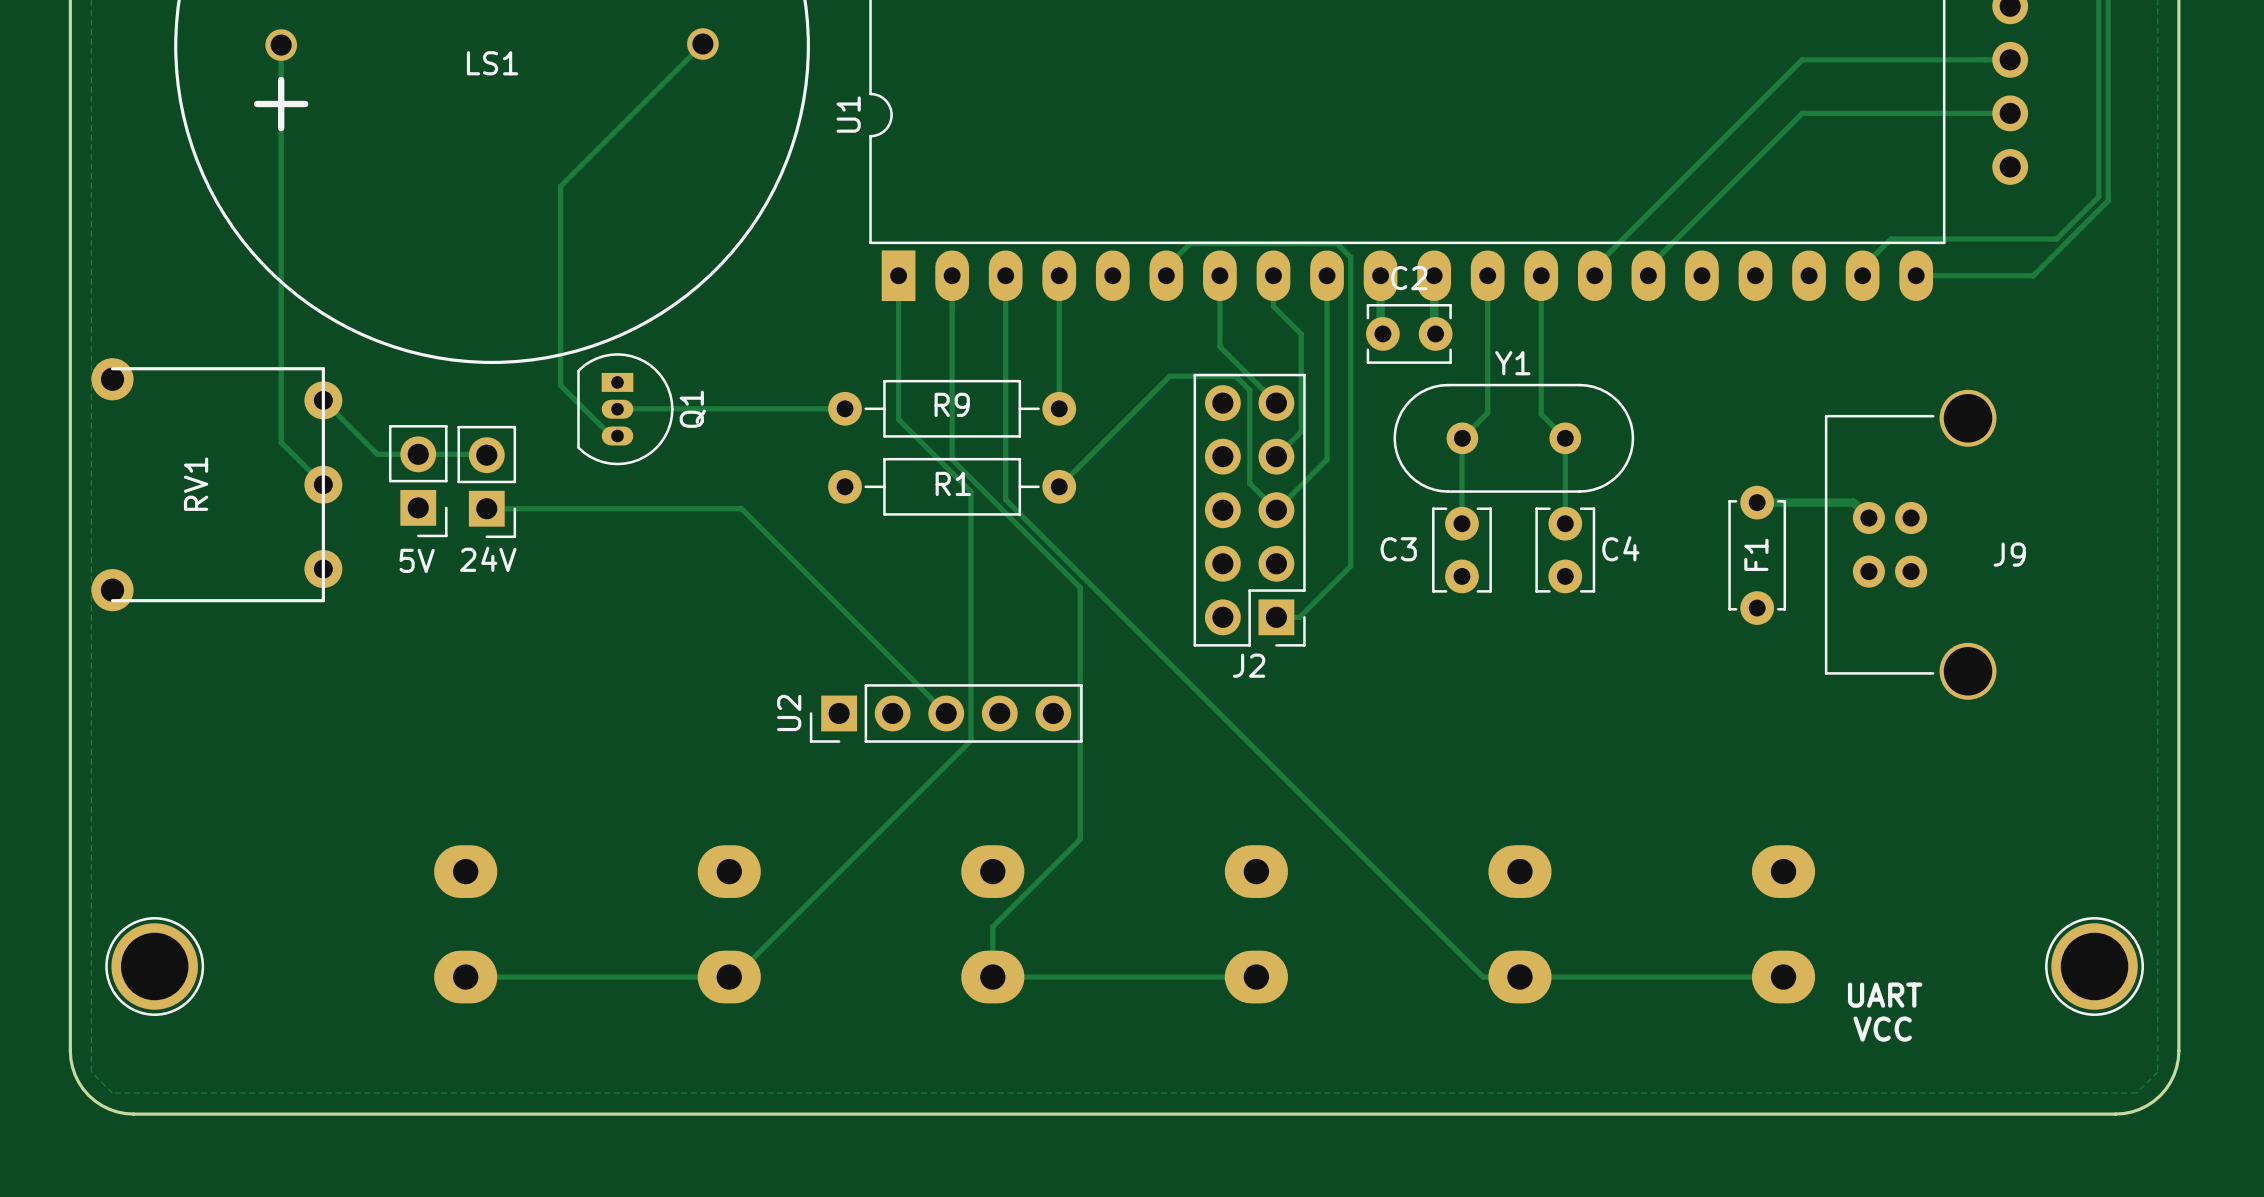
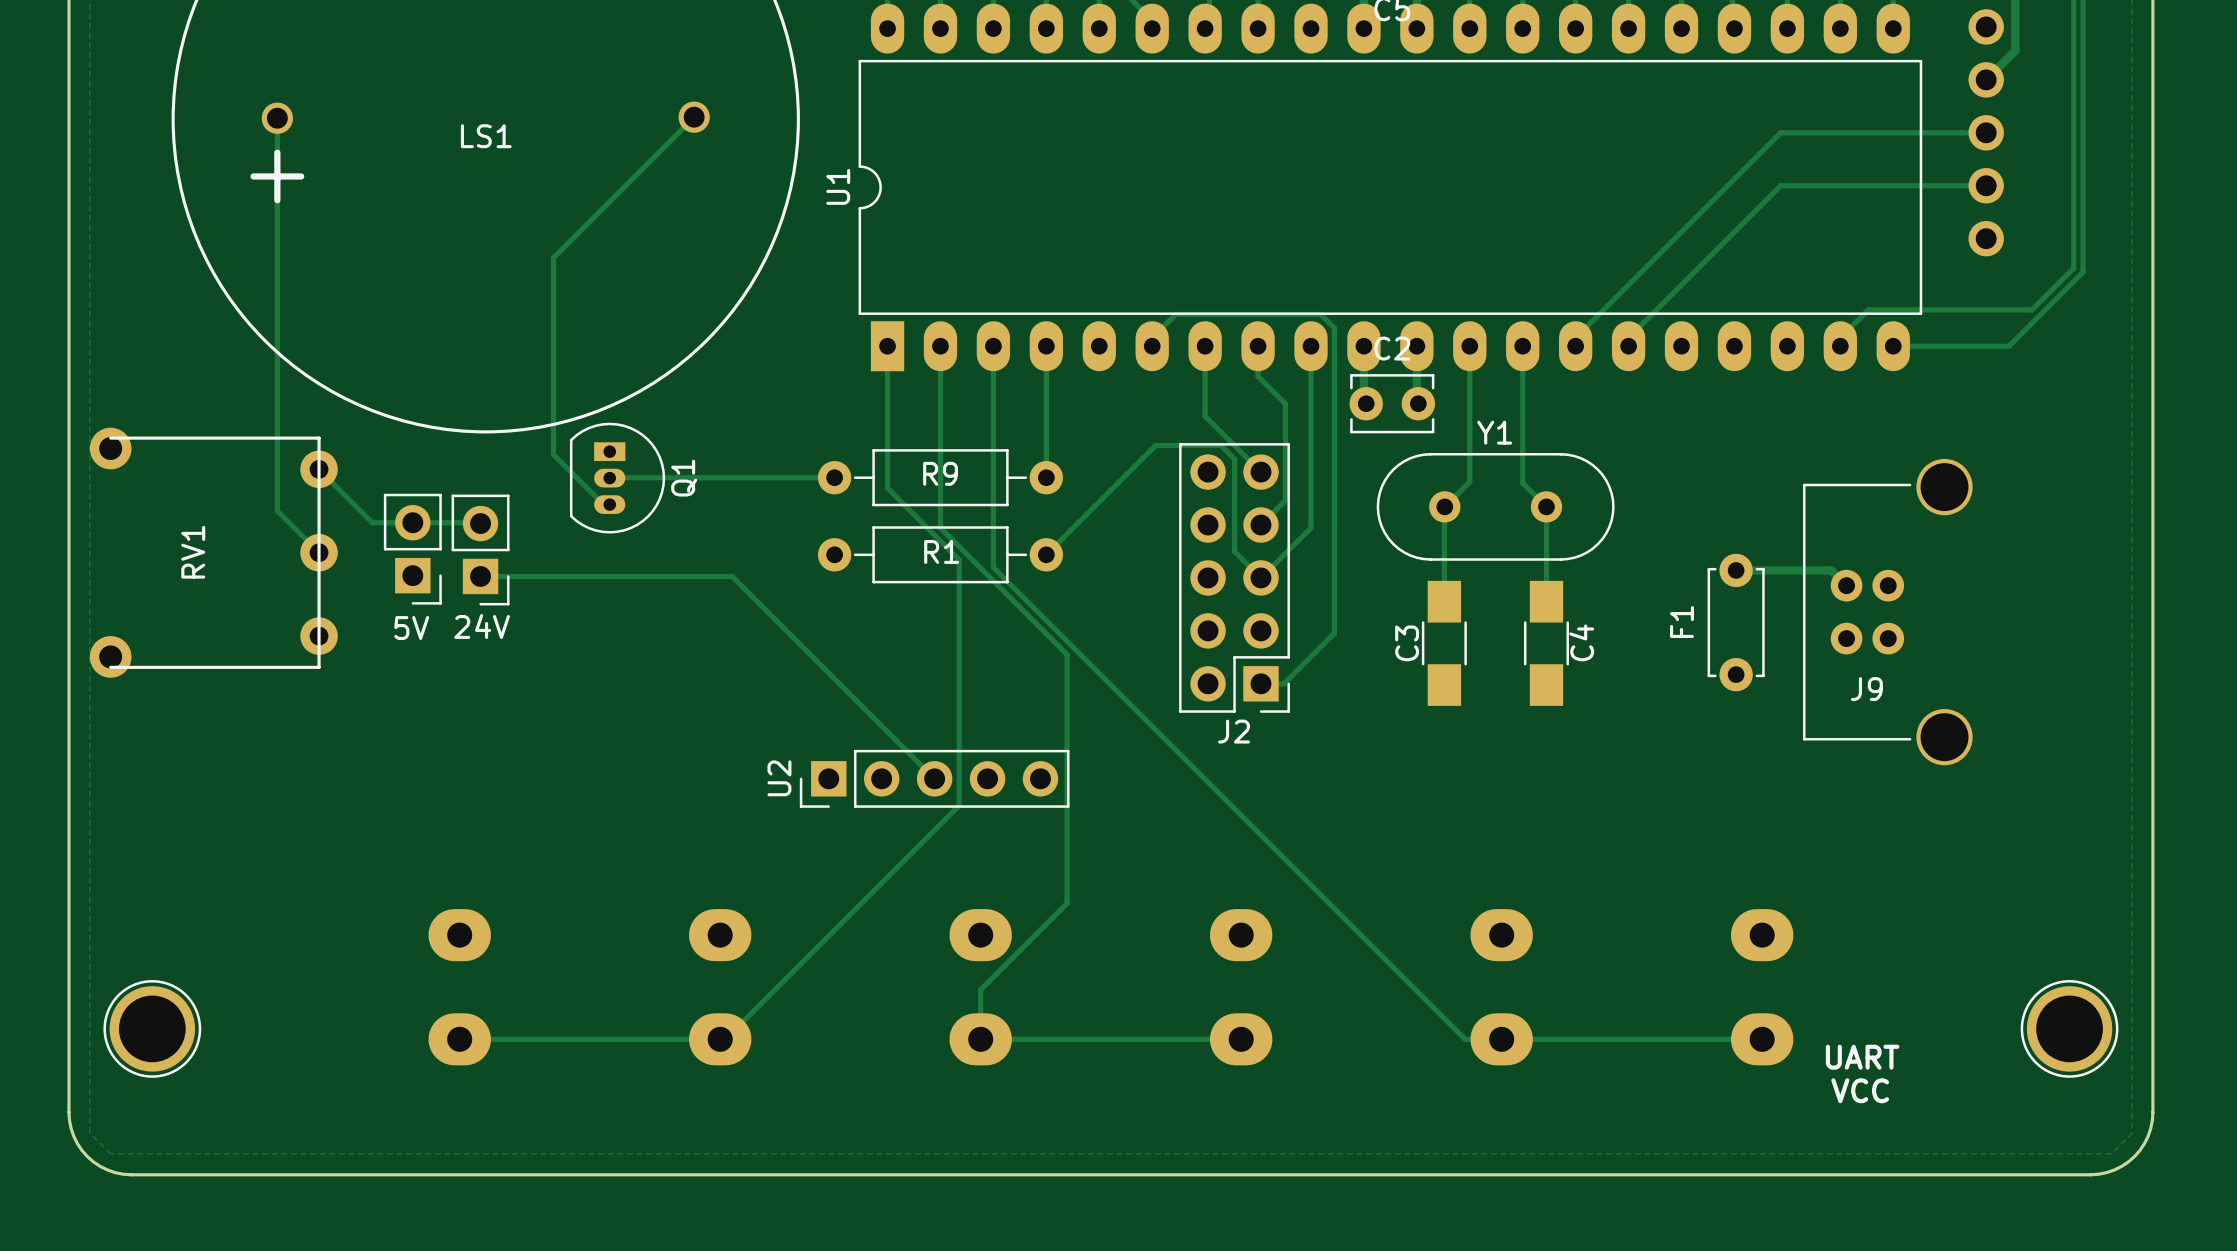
C3 footprint: [1432, 506, 1492, 594] -> [1421, 580, 1467, 706]
C4 footprint: [1535, 506, 1596, 594] -> [1523, 580, 1569, 706]
F1 name position: F1 (1756, 554) -> F1 (1682, 622)
J9 name position: J9 (2009, 554) -> J9 (1866, 689)

